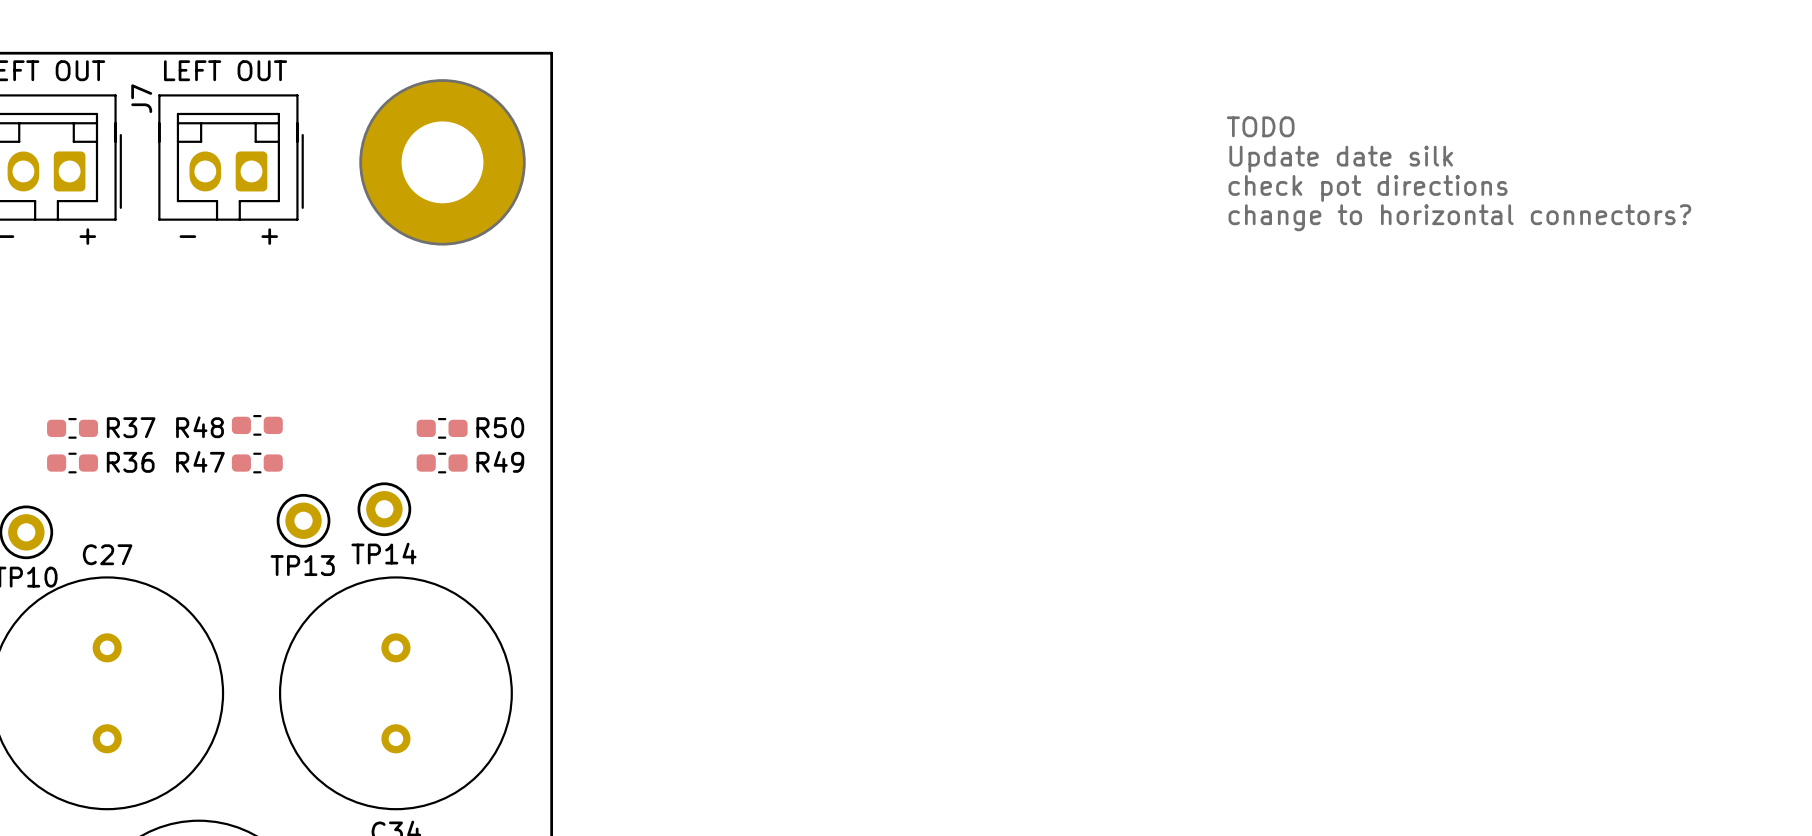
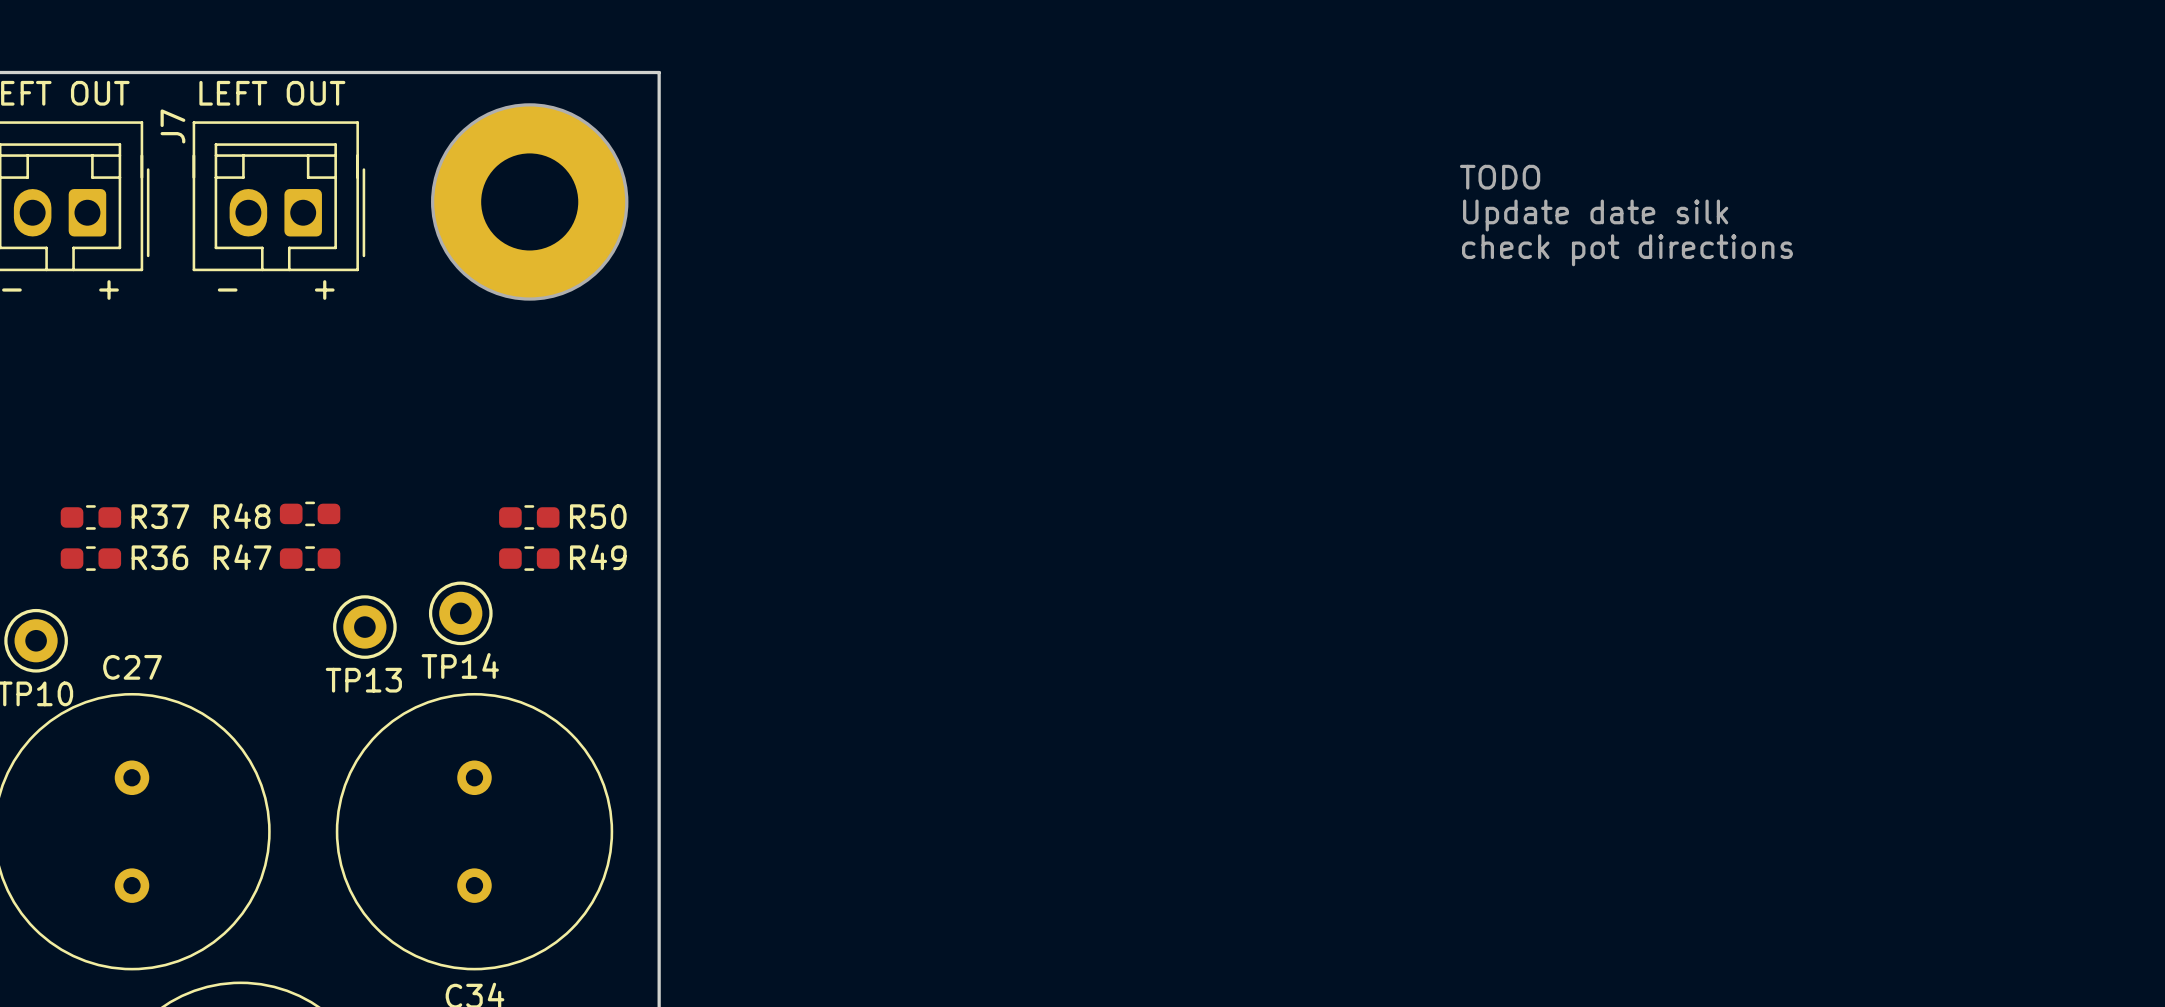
text position: TODO (1260, 126) -> TODO (1500, 177)
text position: Update date silk (1341, 159) -> Update date silk (1595, 215)
text position: check pot directions (1368, 188) -> check pot directions (1627, 250)
text: change to horizontal connectors? (1459, 217) -> none

